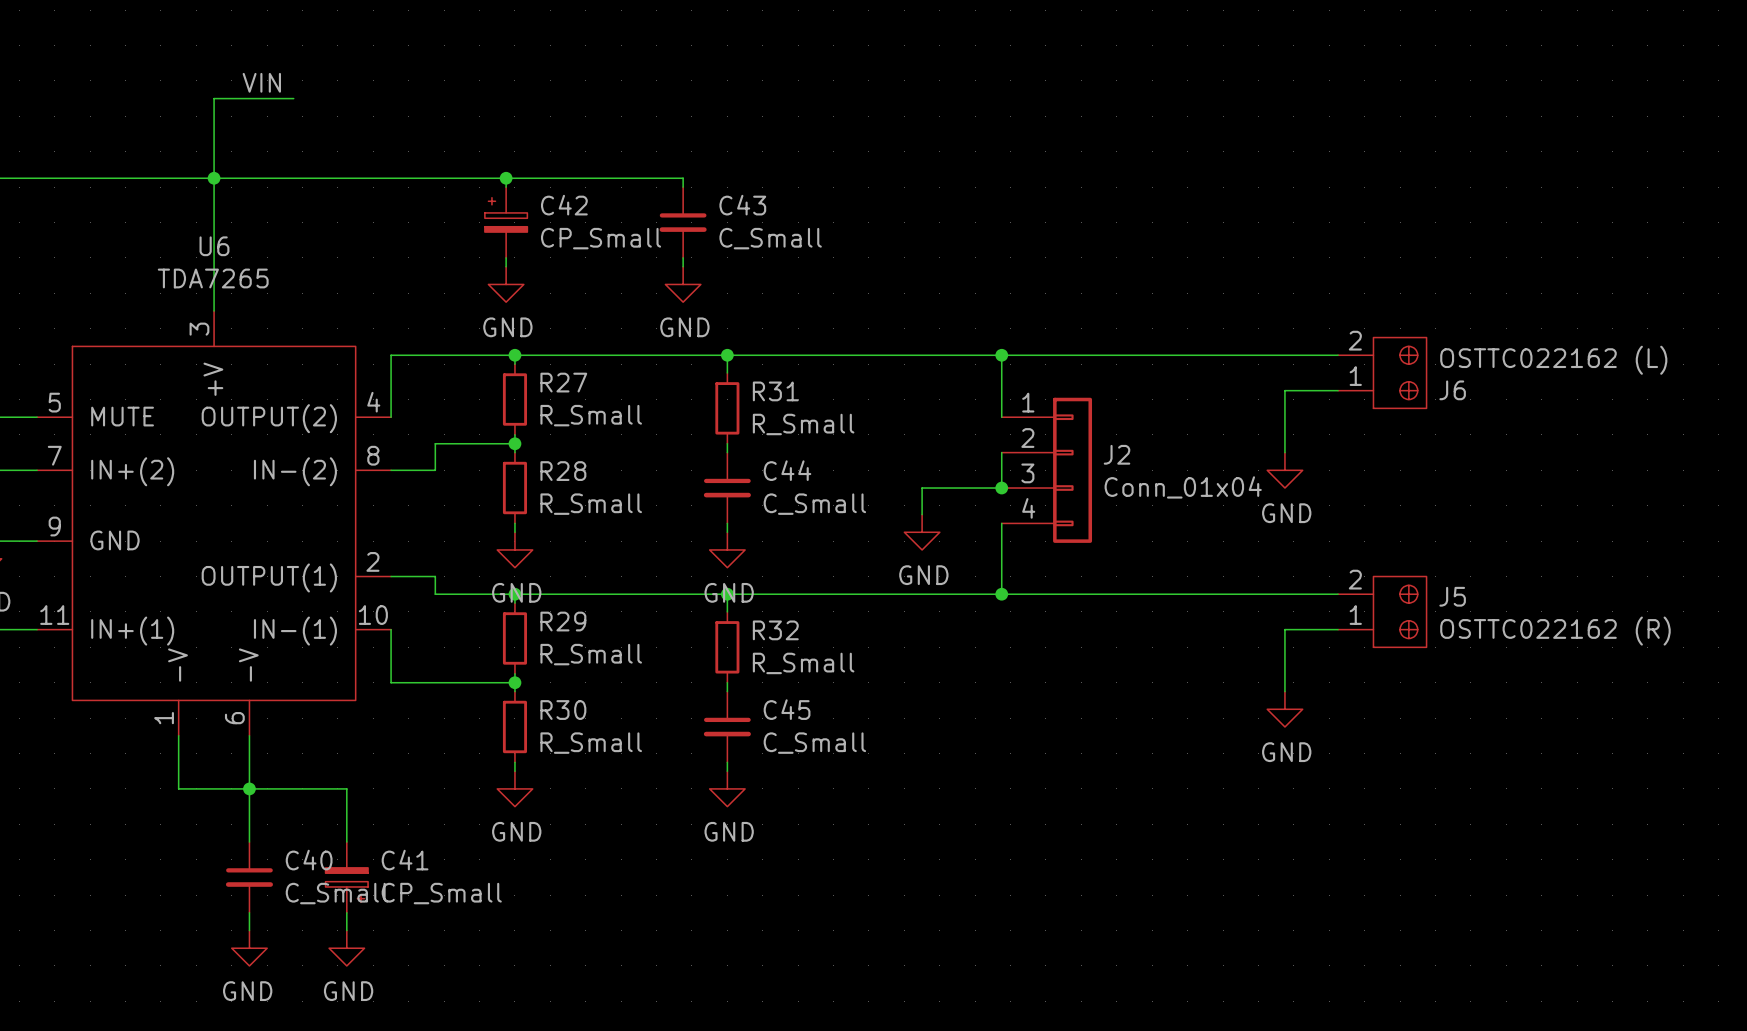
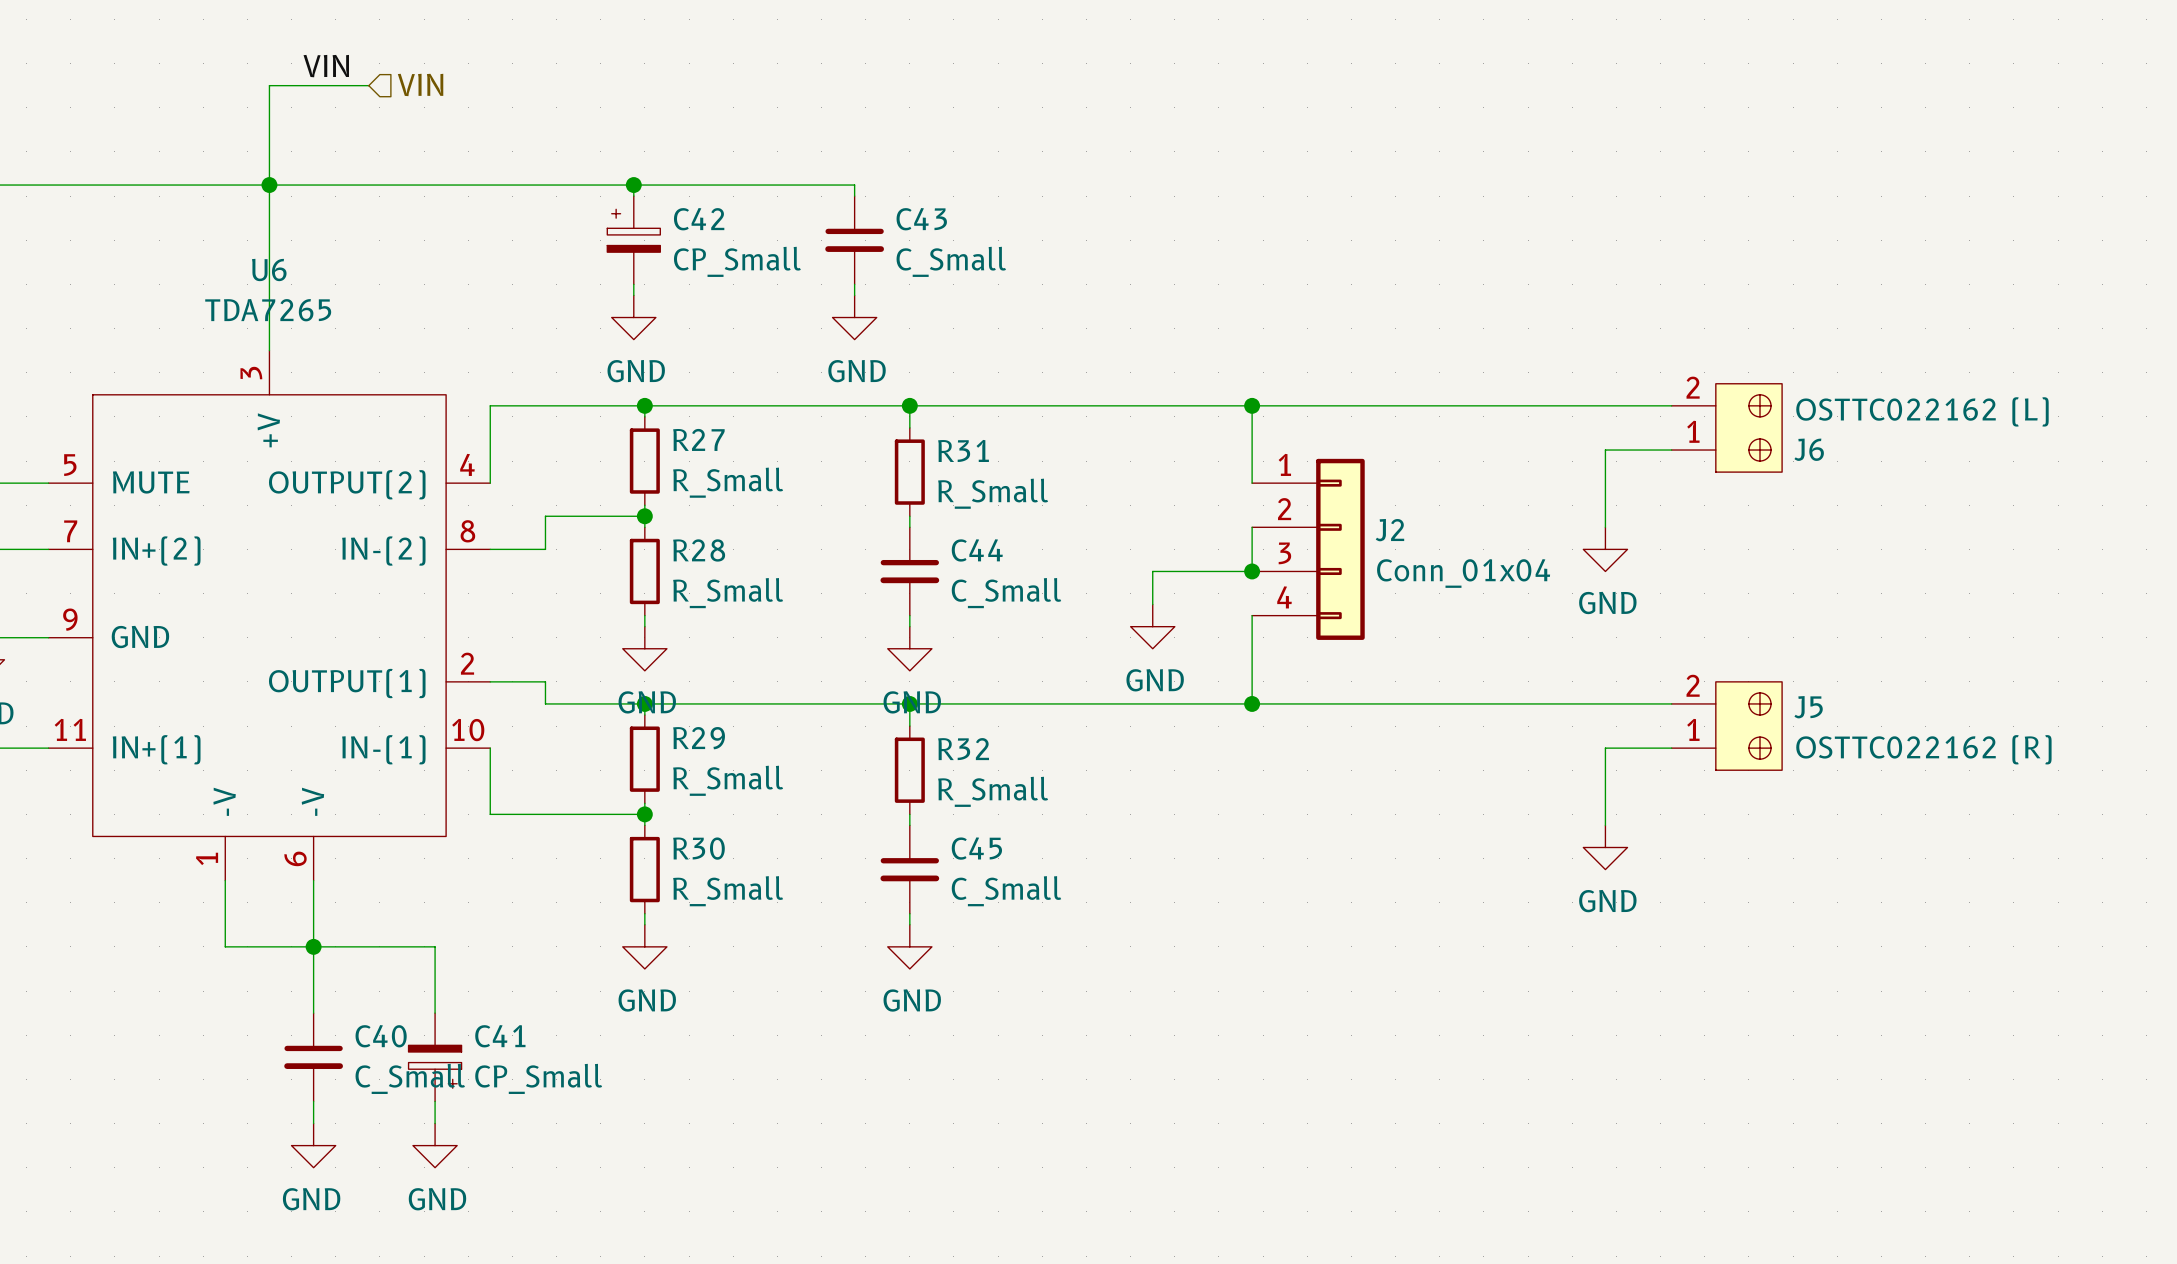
hierarchical label: none -> VIN (420, 84)

